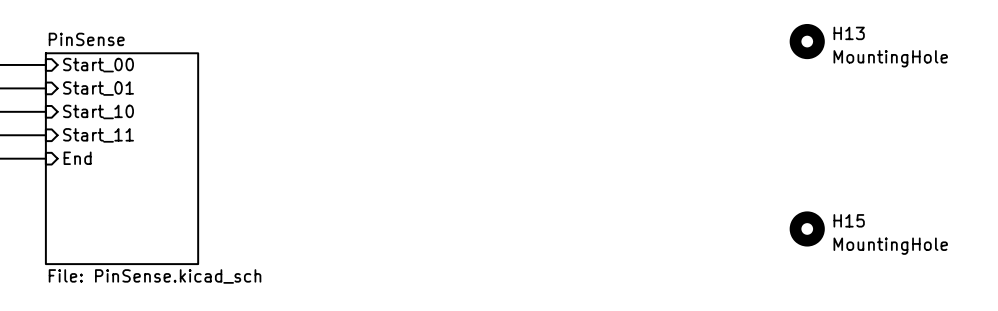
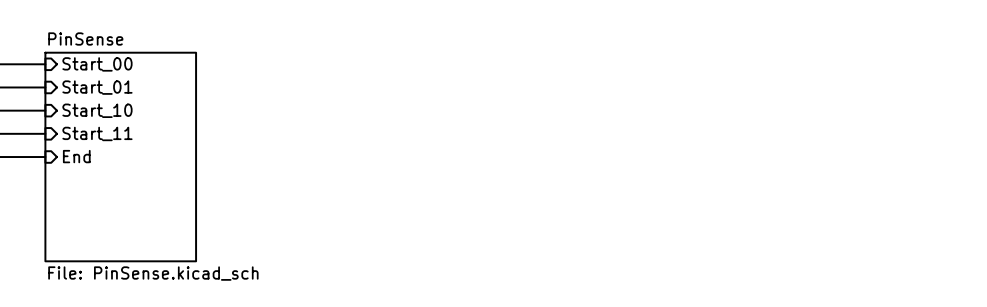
H13: MountingHole (807, 41) -> none
H15: MountingHole (807, 228) -> none

